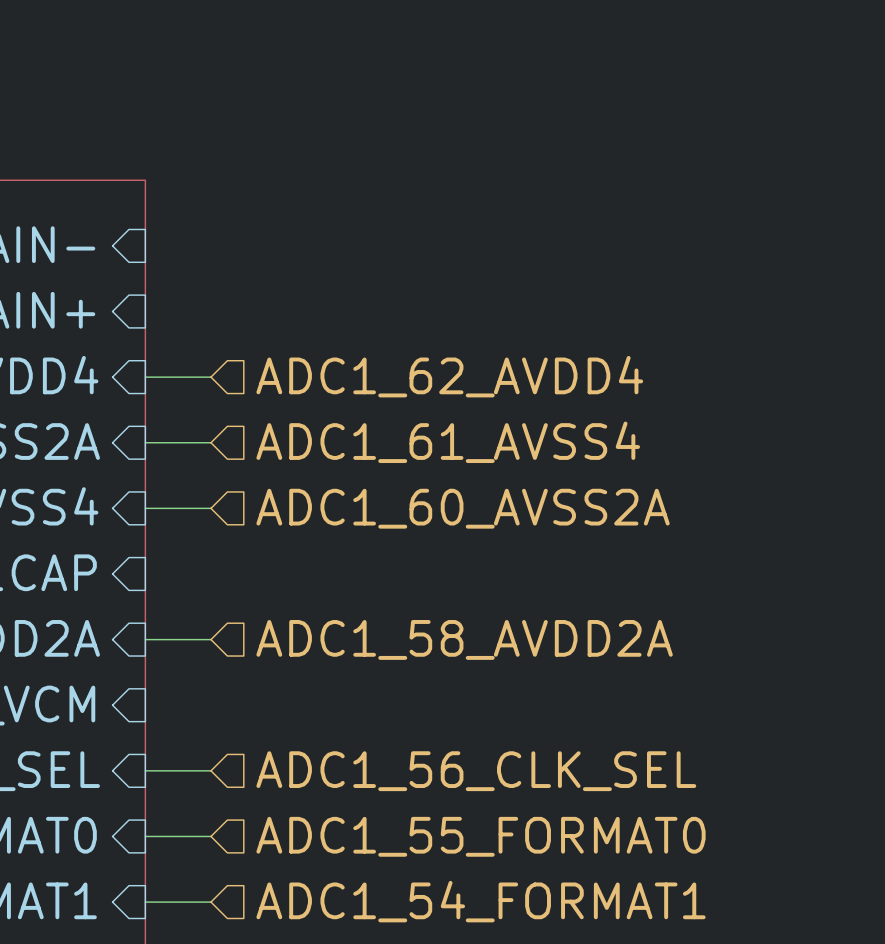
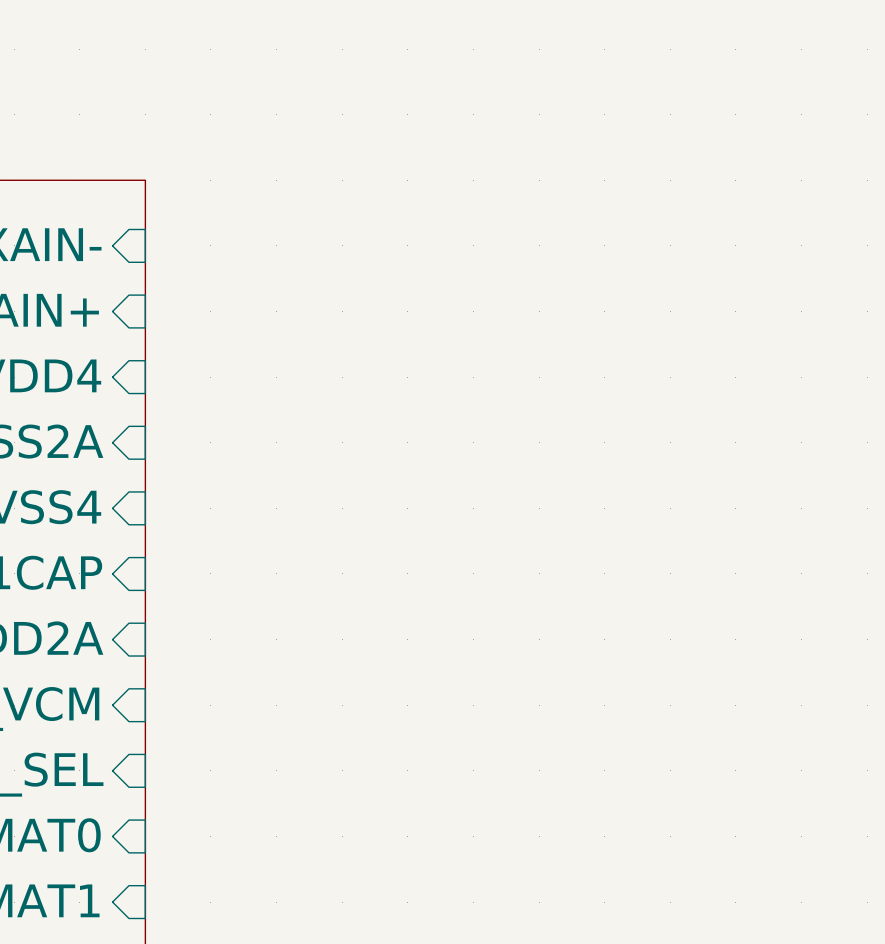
hierarchical label: ADC1_62_AVDD4 (449, 376) -> none
wire: (145, 377) (210, 377) -> none
wire: (145, 442) (210, 442) -> none
hierarchical label: ADC1_61_AVSS4 (448, 442) -> none
wire: (145, 508) (210, 508) -> none
hierarchical label: ADC1_60_AVSS2A (463, 508) -> none
wire: (145, 639) (210, 639) -> none
hierarchical label: ADC1_58_AVDD2A (464, 639) -> none
wire: (145, 770) (210, 770) -> none
hierarchical label: ADC1_56_CLK_SEL (476, 771) -> none
wire: (145, 836) (210, 836) -> none
hierarchical label: ADC1_55_FORMAT0 (481, 836) -> none
hierarchical label: ADC1_54_FORMAT1 (481, 901) -> none
wire: (145, 902) (210, 902) -> none

